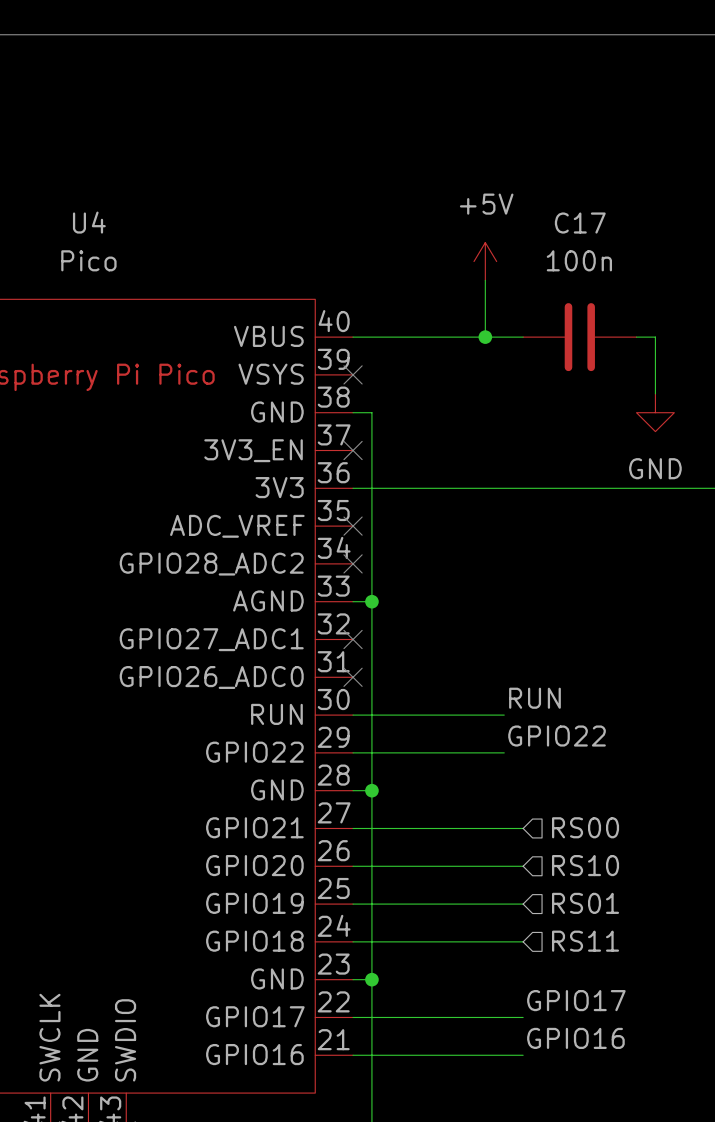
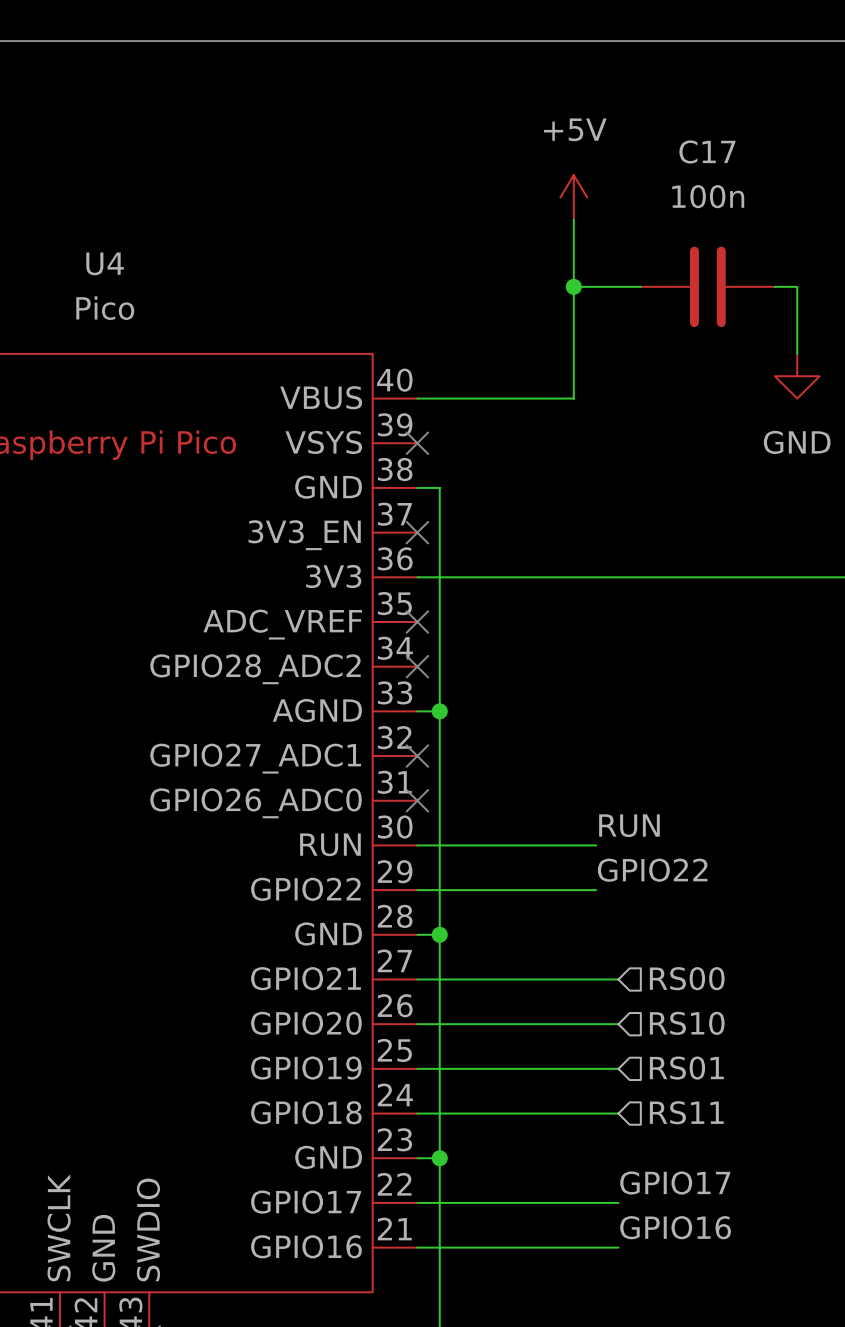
wire: none -> (573, 219) (573, 331)
wire: none -> (573, 286) (640, 286)
junction: none -> (573, 286)
power symbol position: +5V (485, 261) -> +5V (573, 197)
wire: (485, 337) (523, 337) -> none
junction: (485, 337) -> none
C17 position: (579, 337) -> (707, 286)
wire: (636, 337) (655, 337) (655, 393) -> (774, 286) (797, 286) (797, 353)
power symbol position: GND (655, 412) -> GND (797, 376)

